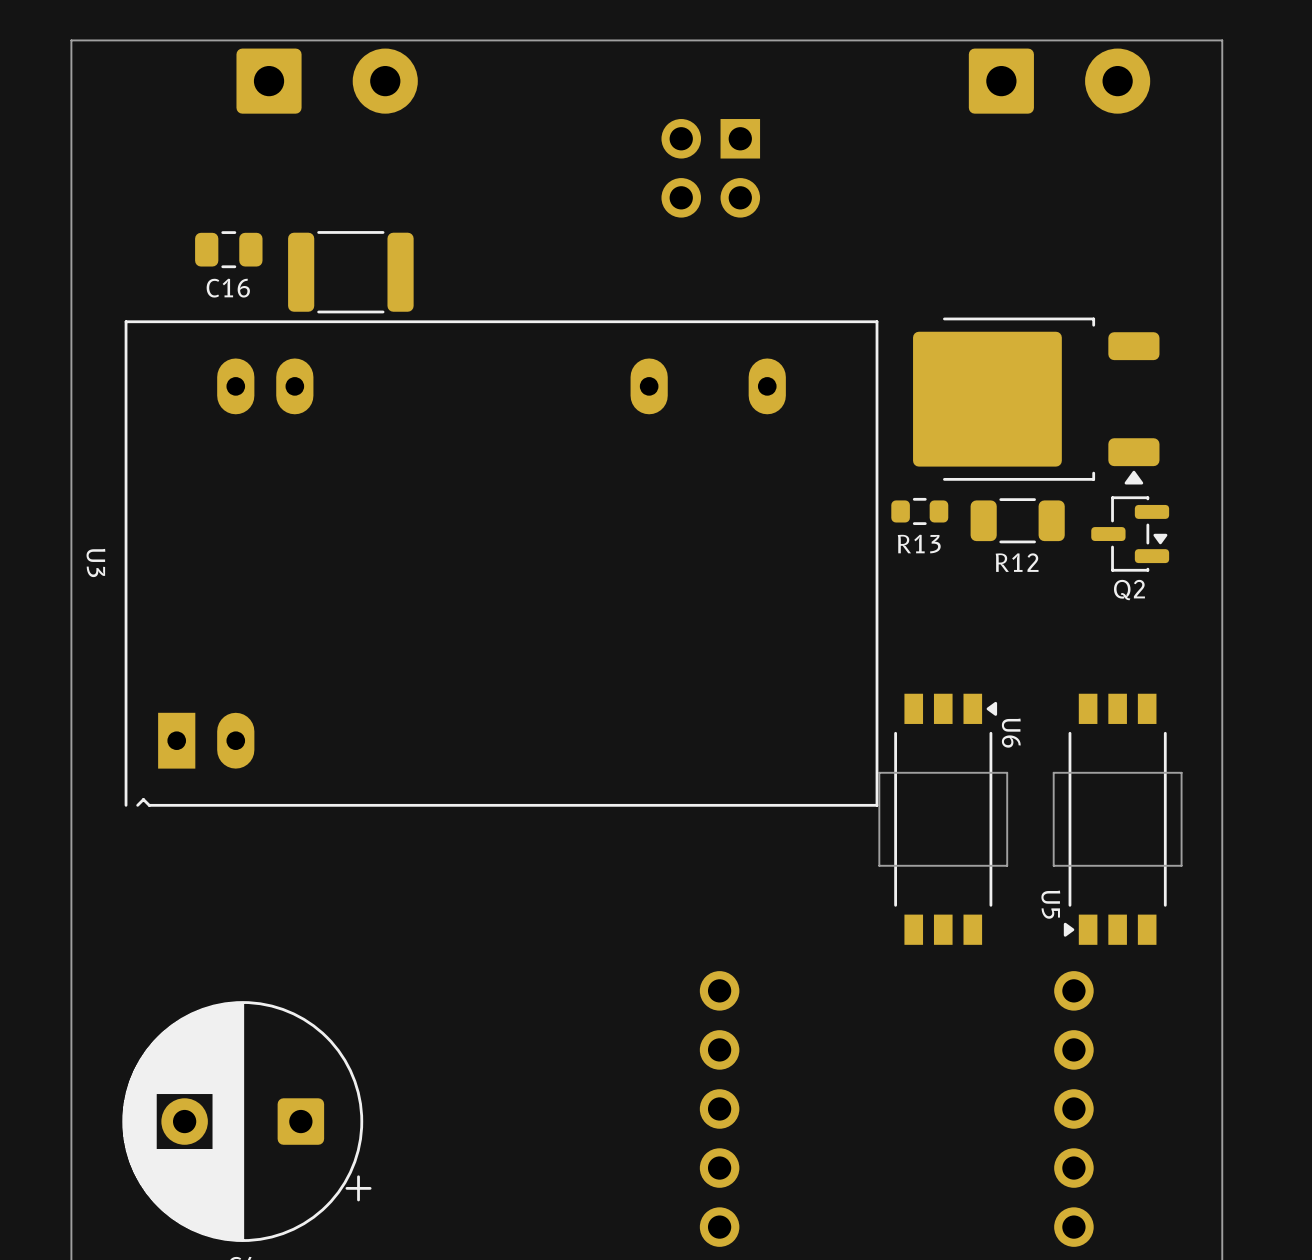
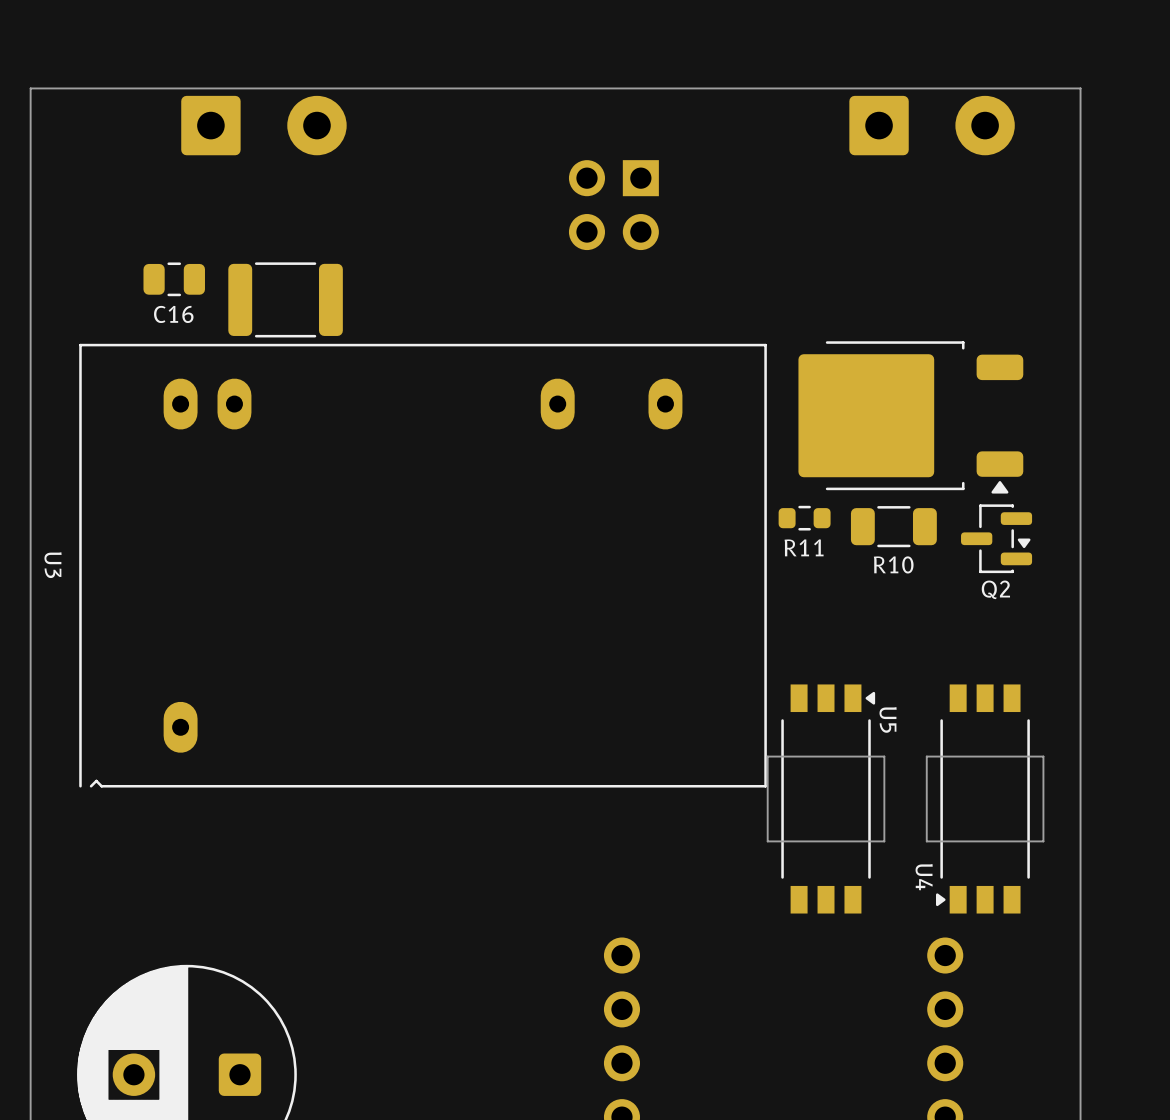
U3 footprint: [124, 320, 879, 807] -> [79, 343, 767, 788]
R13 name: R13 (919, 544) -> R11 (804, 547)
R12 name: R12 (1017, 562) -> R10 (893, 564)
U6 name: U6 (1011, 733) -> U5 (888, 719)
U5 name: U5 (1050, 904) -> U4 (924, 877)

